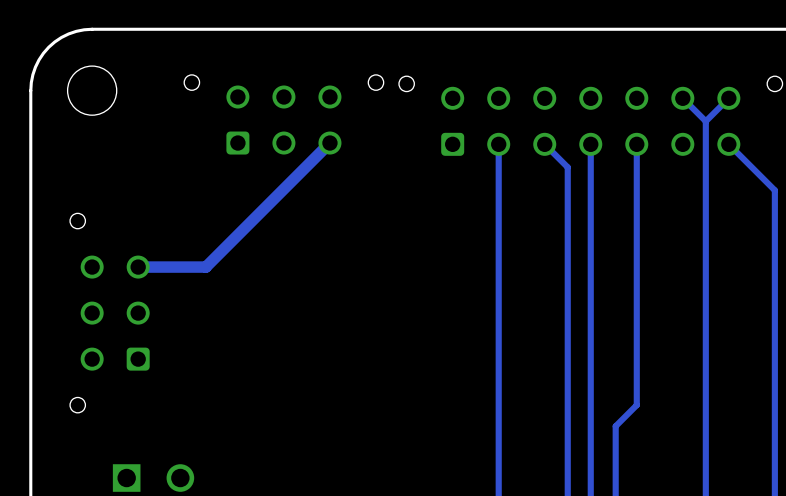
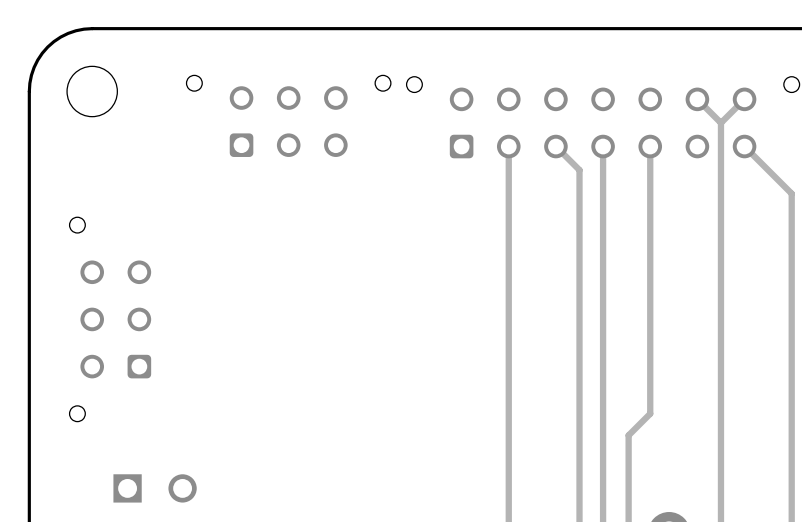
track: (329, 143) (205, 267) (138, 267) -> none

